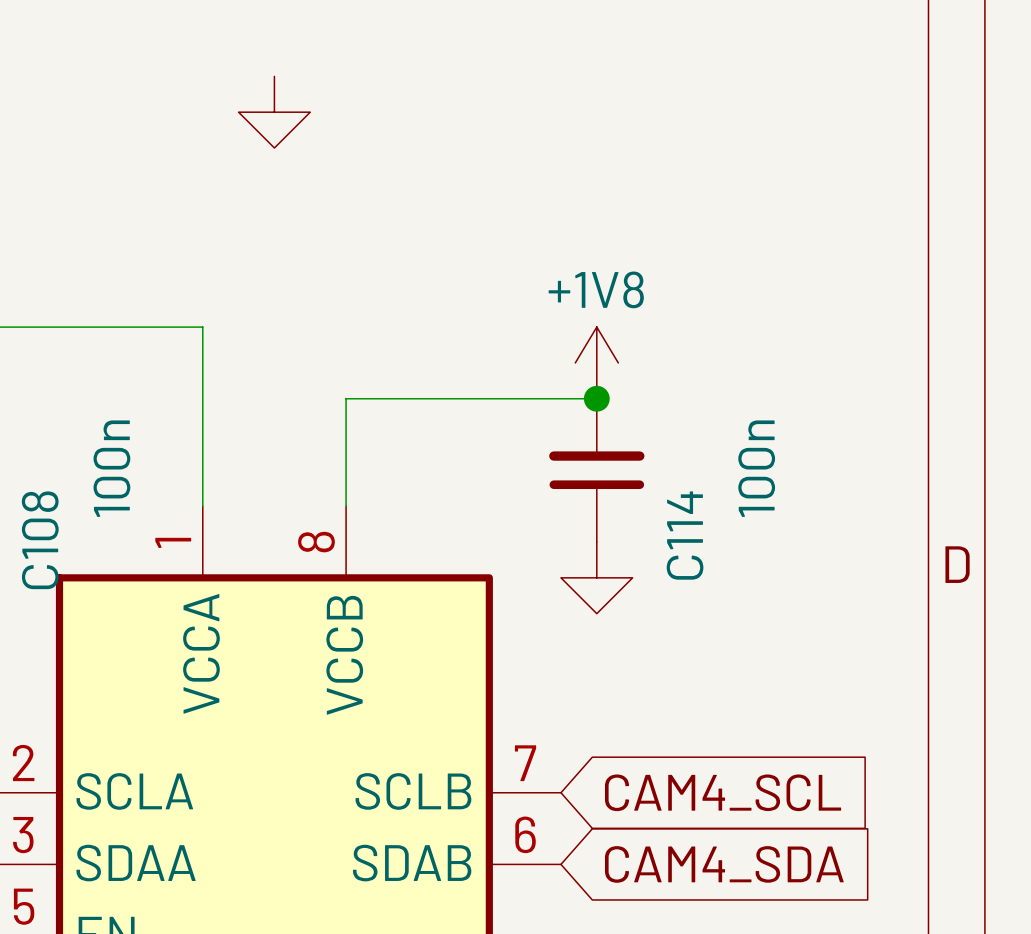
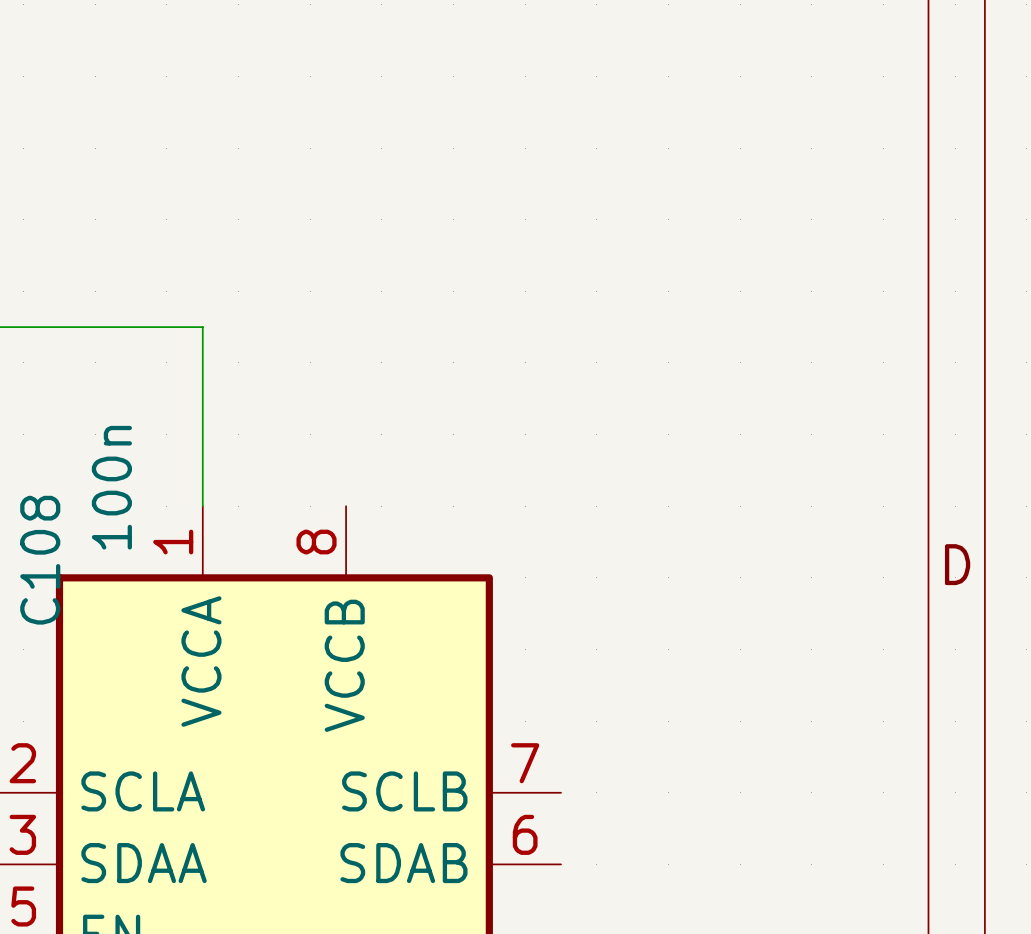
power symbol: (274, 112) -> none
power symbol: +1V8 (596, 362) -> none
wire: (596, 398) (346, 398) (346, 506) -> none
junction: (596, 398) -> none
C114: 100n (596, 470) -> none
power symbol: (596, 577) -> none
global label: CAM4_SCL (723, 792) -> none
global label: CAM4_SDA (724, 864) -> none

